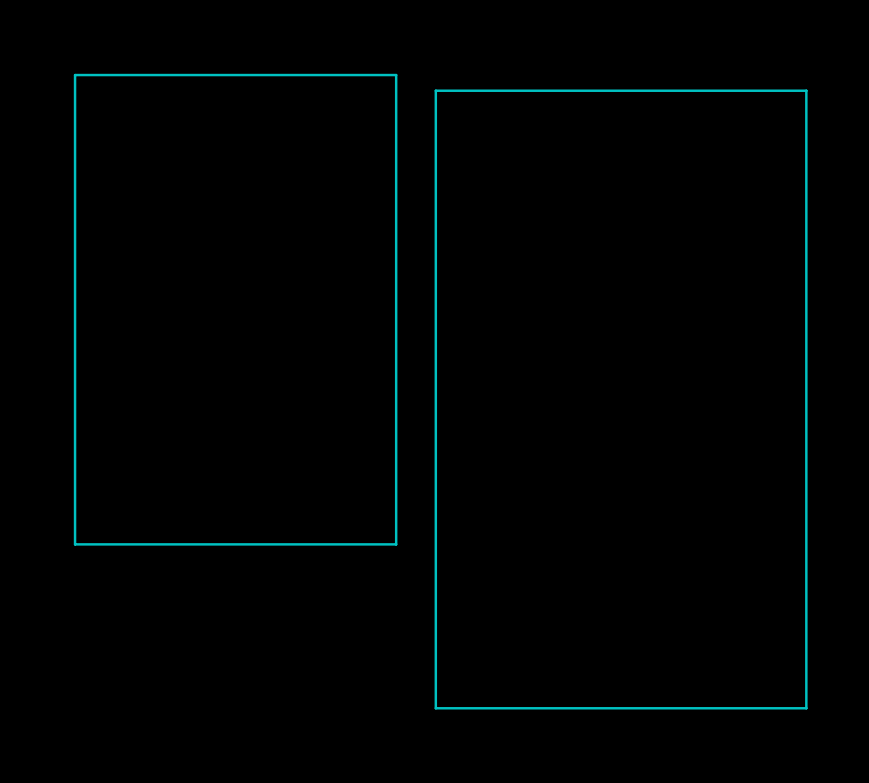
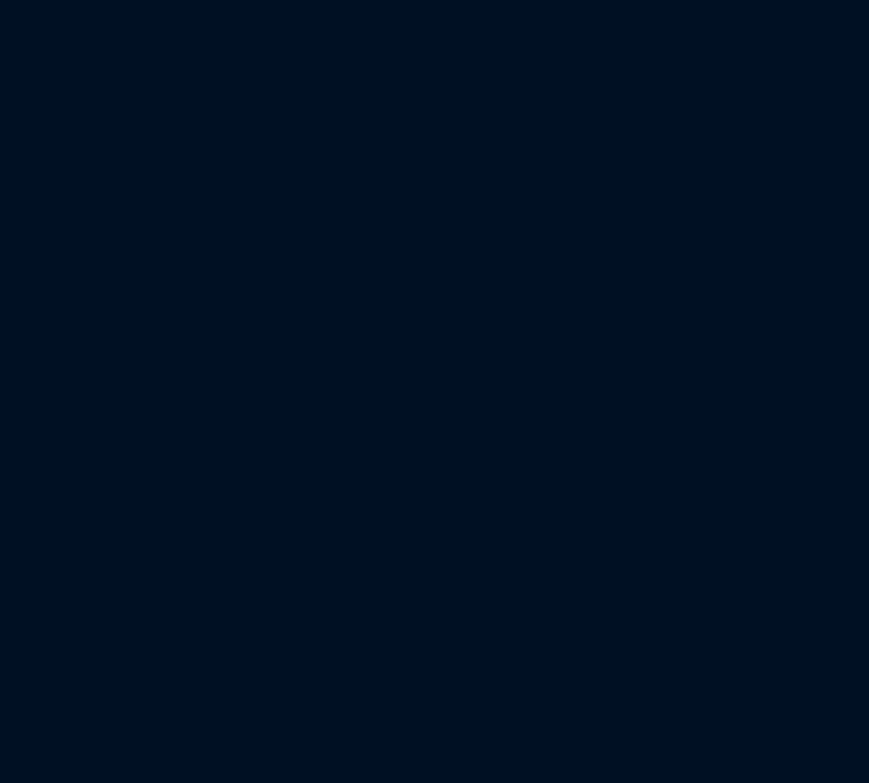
line: (75, 75) (75, 544) (396, 544) (396, 75) (75, 75) -> none
line: (435, 90) (435, 708) (806, 708) (806, 90) (435, 90) -> none

